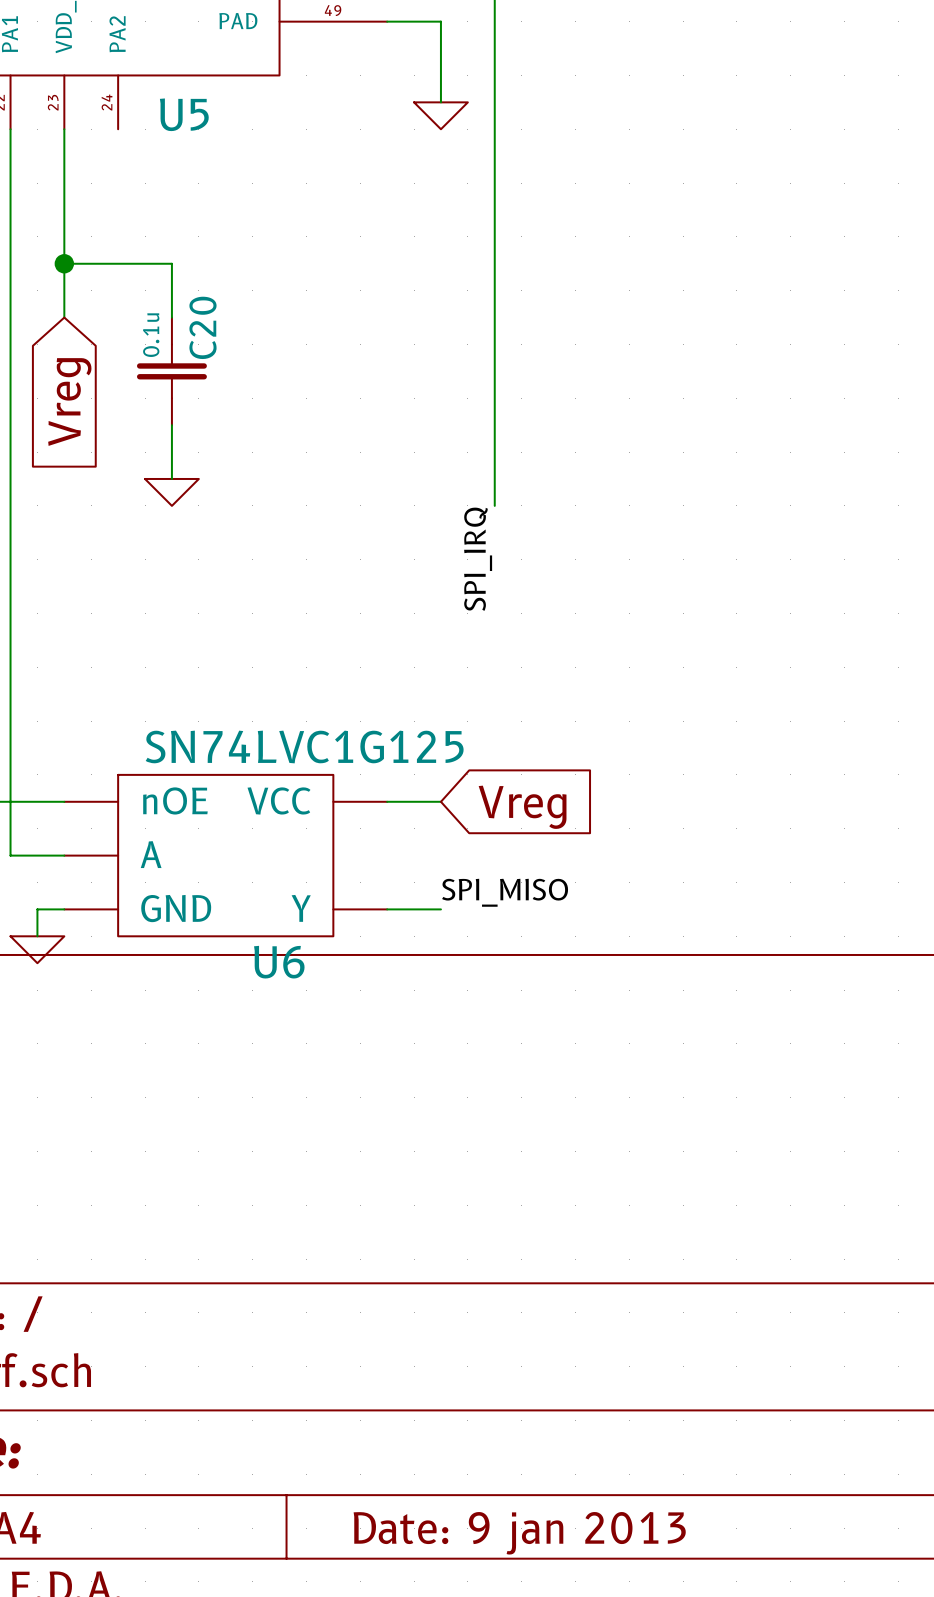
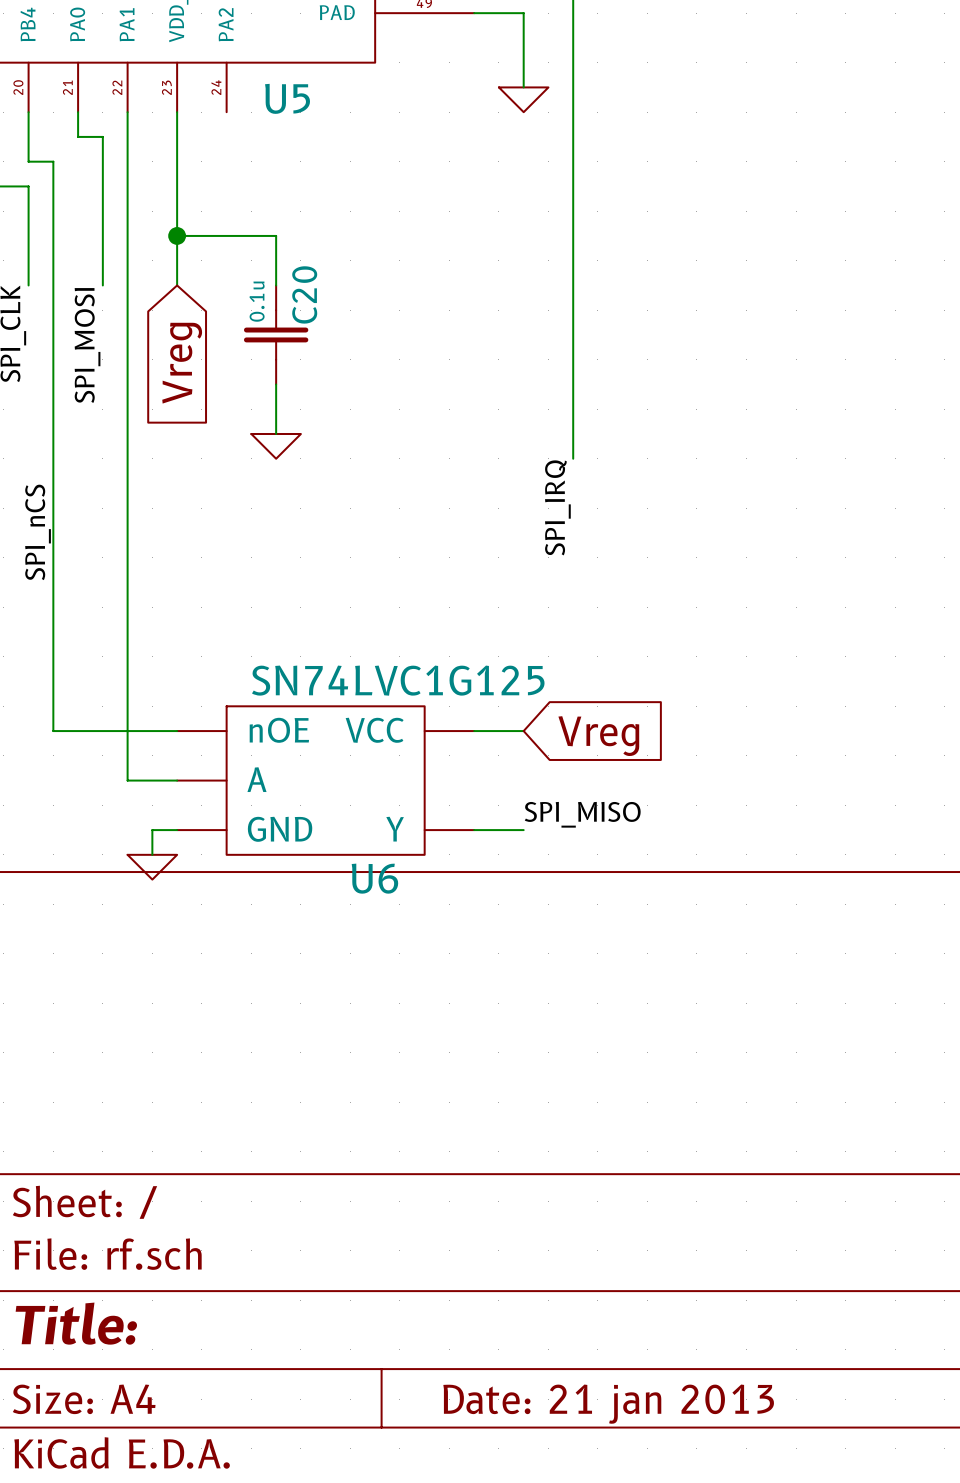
title block: Date: 9 jan 2013 (519, 1533) -> Date: 21 jan 2013 (608, 1404)

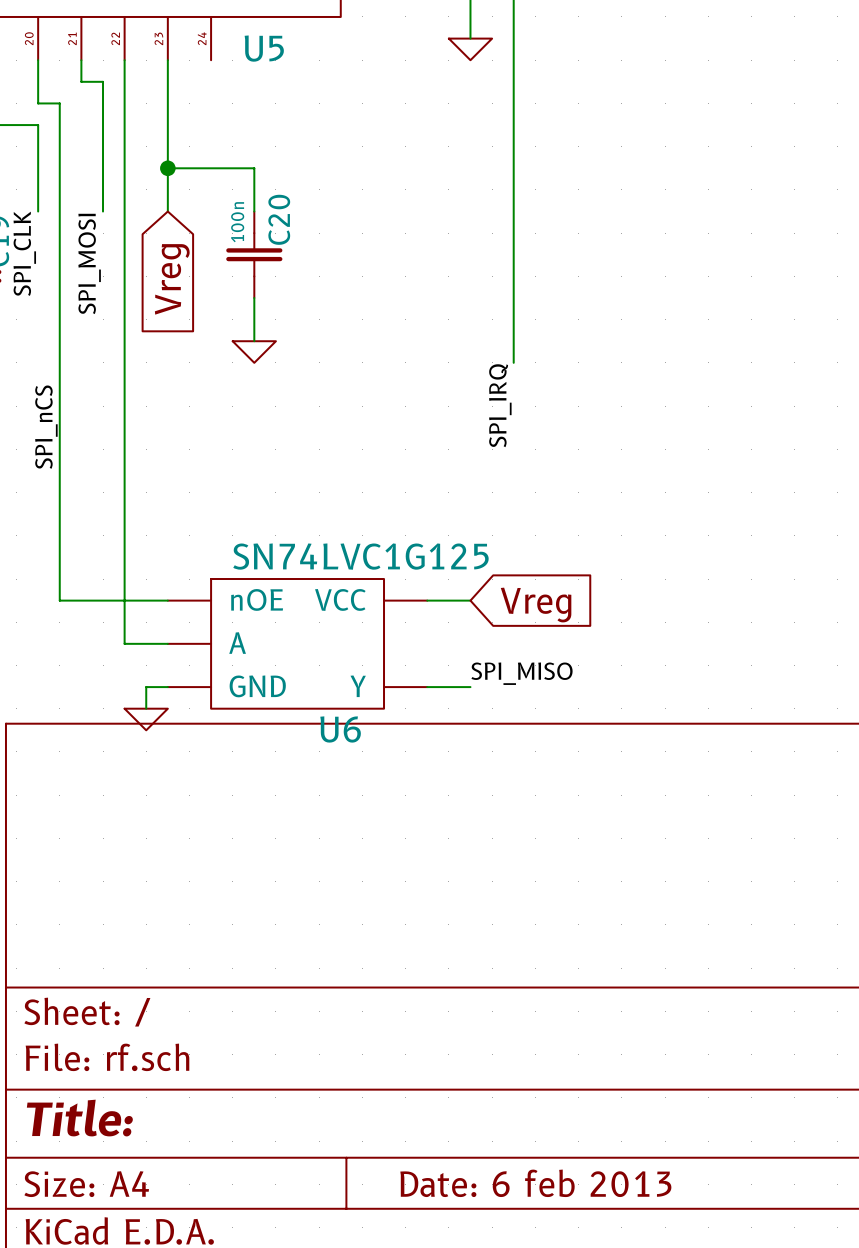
C20 value: 0.1u (257, 301) -> 100n (237, 222)
title block: Date: 21 jan 2013 (608, 1404) -> Date: 6 feb 2013 (535, 1183)

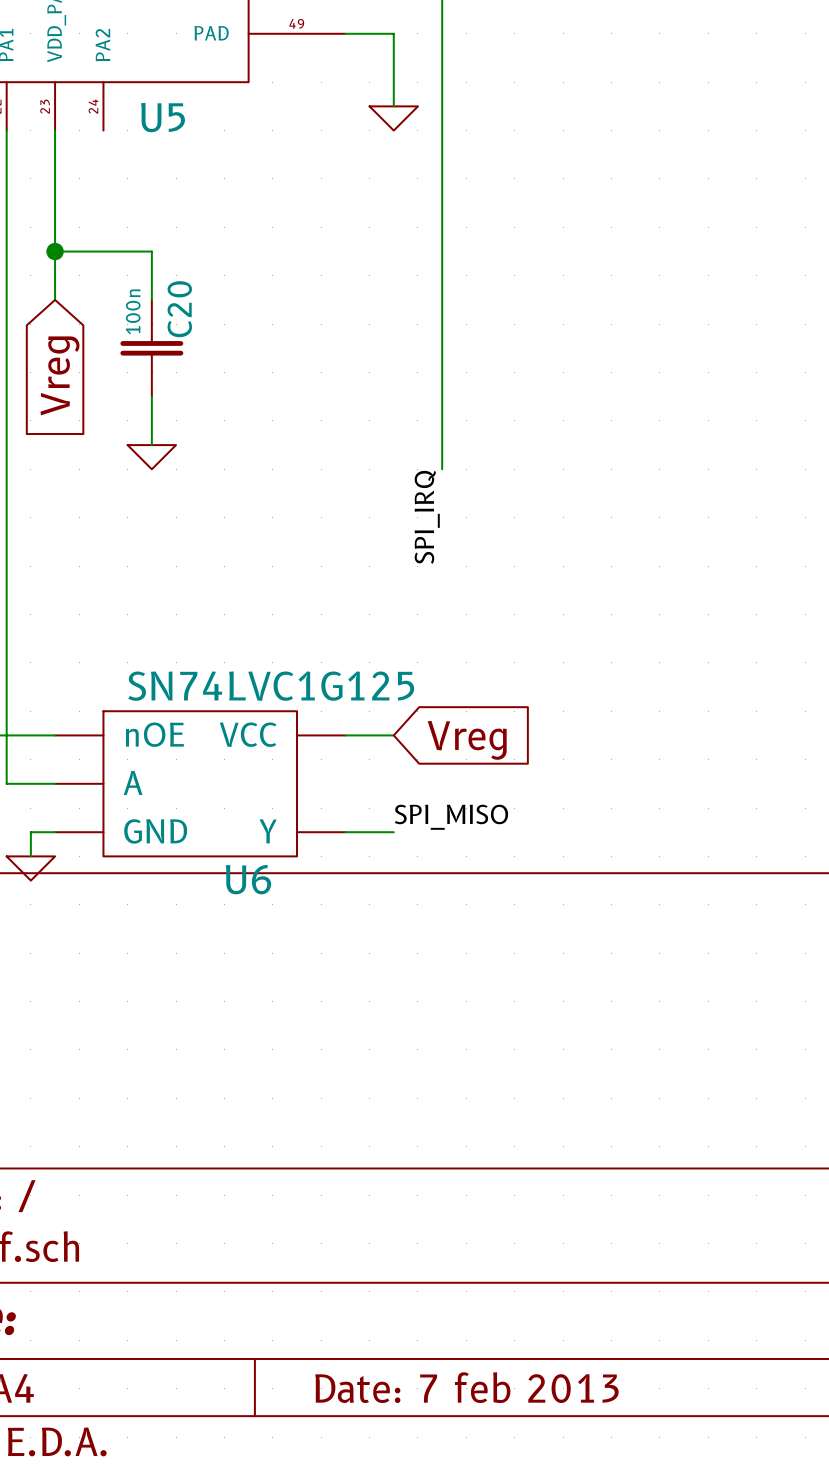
title block: Date: 6 feb 2013 (535, 1183) -> Date: 7 feb 2013 (466, 1387)

